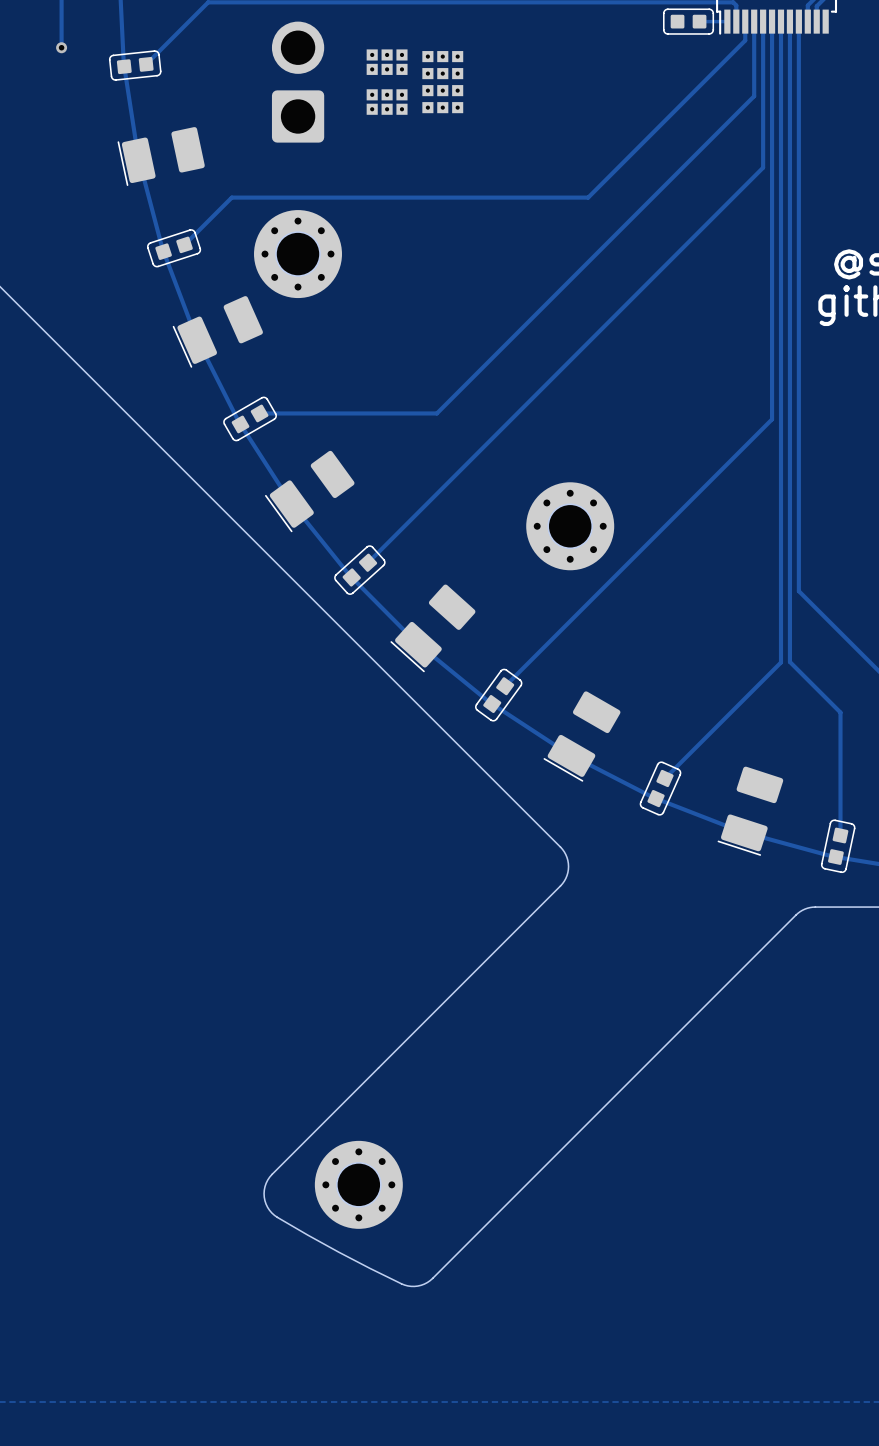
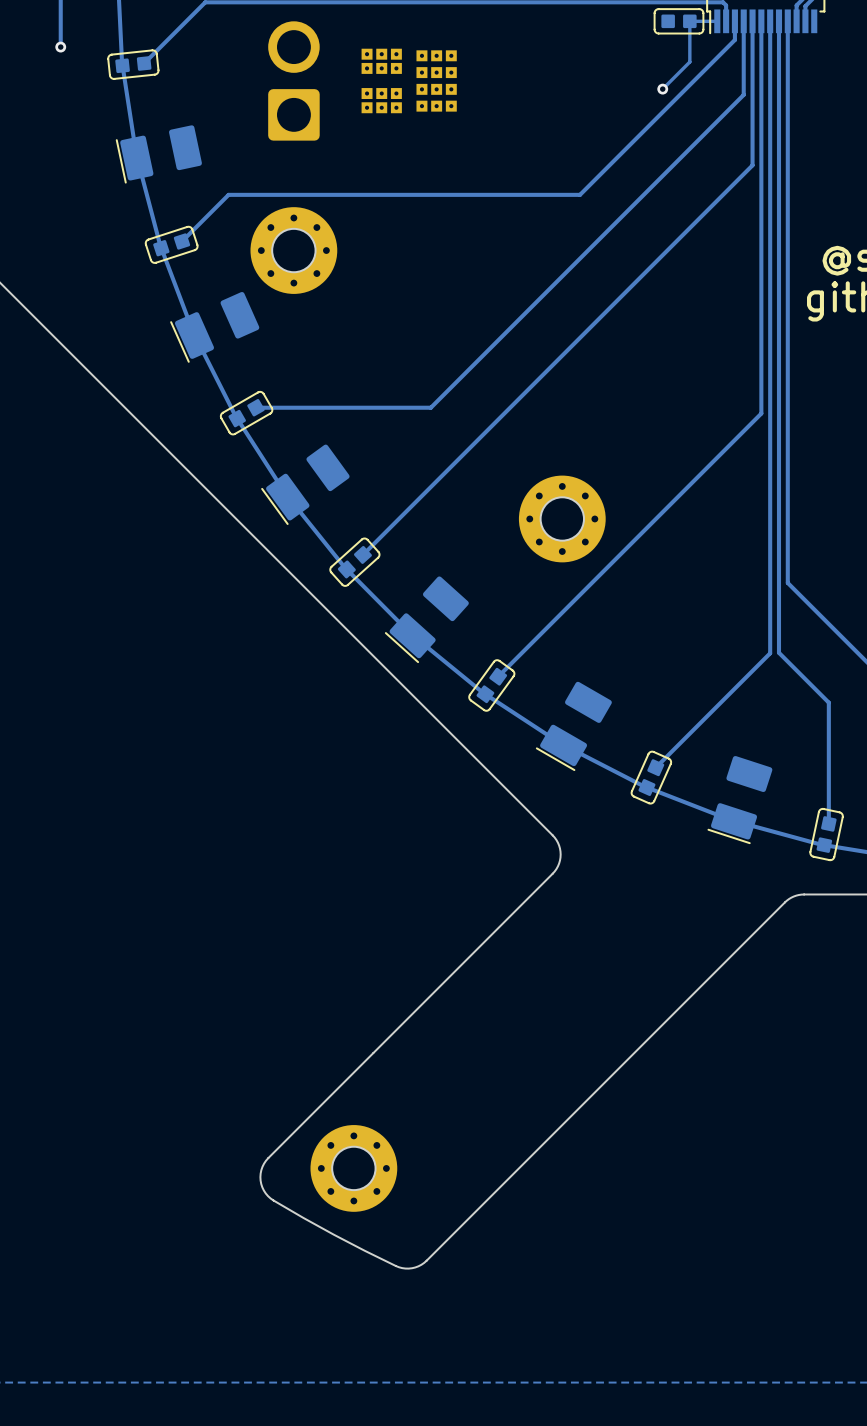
track: none -> (689, 21) (689, 61) (662, 89)
via: none -> (662, 89)

